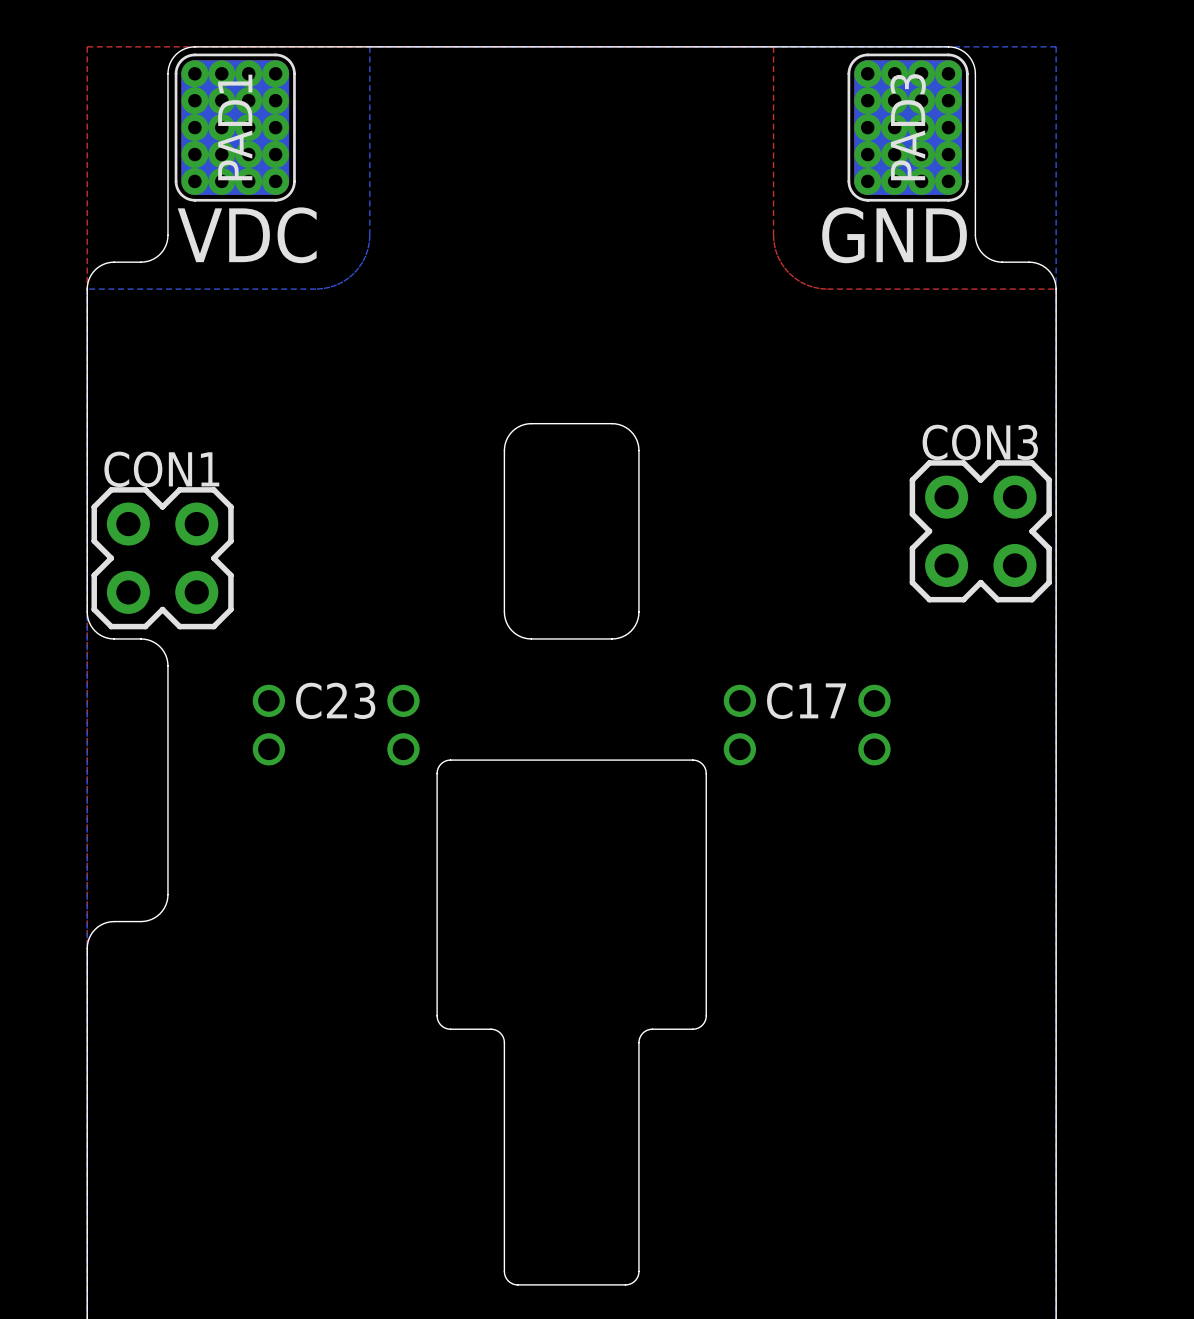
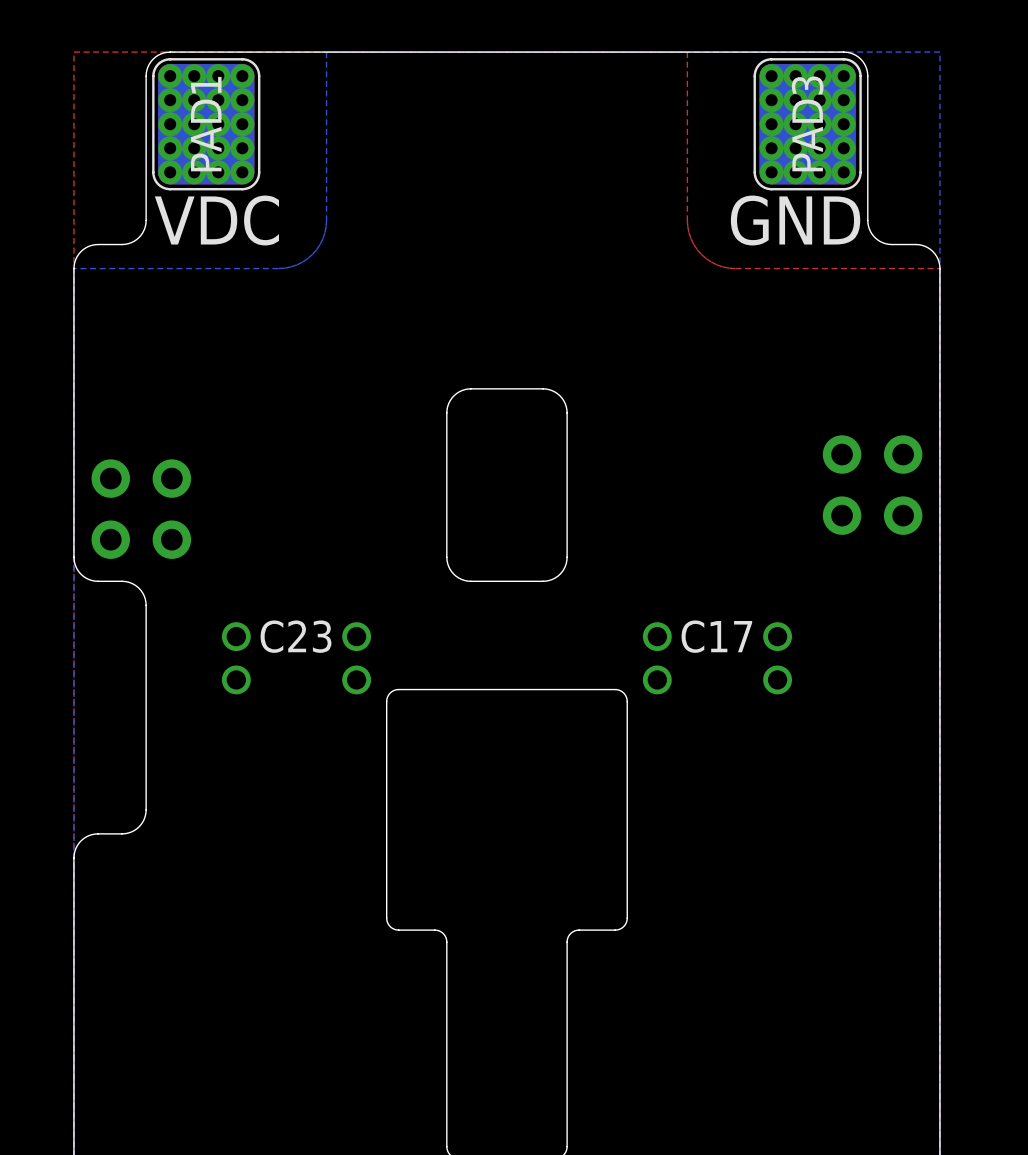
CON3 side: bottom (980, 531) -> top (872, 485)
CON1 side: bottom (162, 558) -> top (141, 509)

